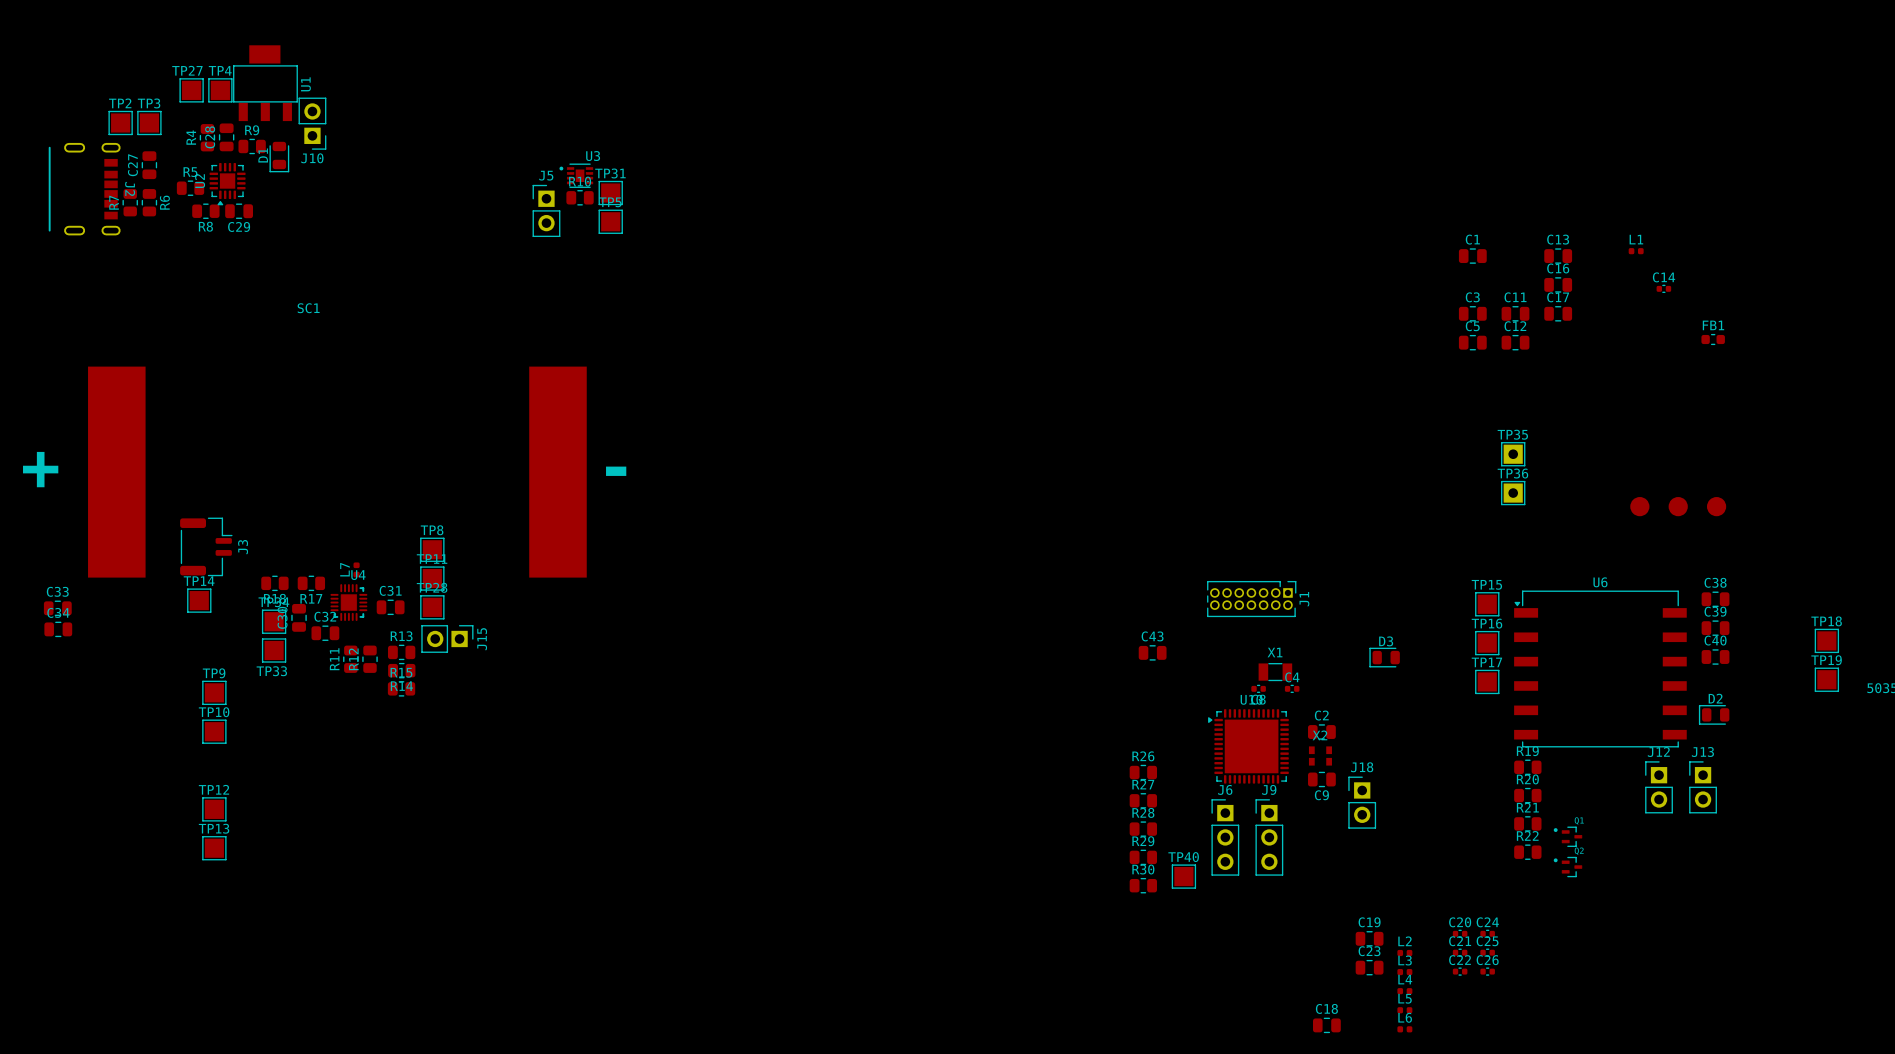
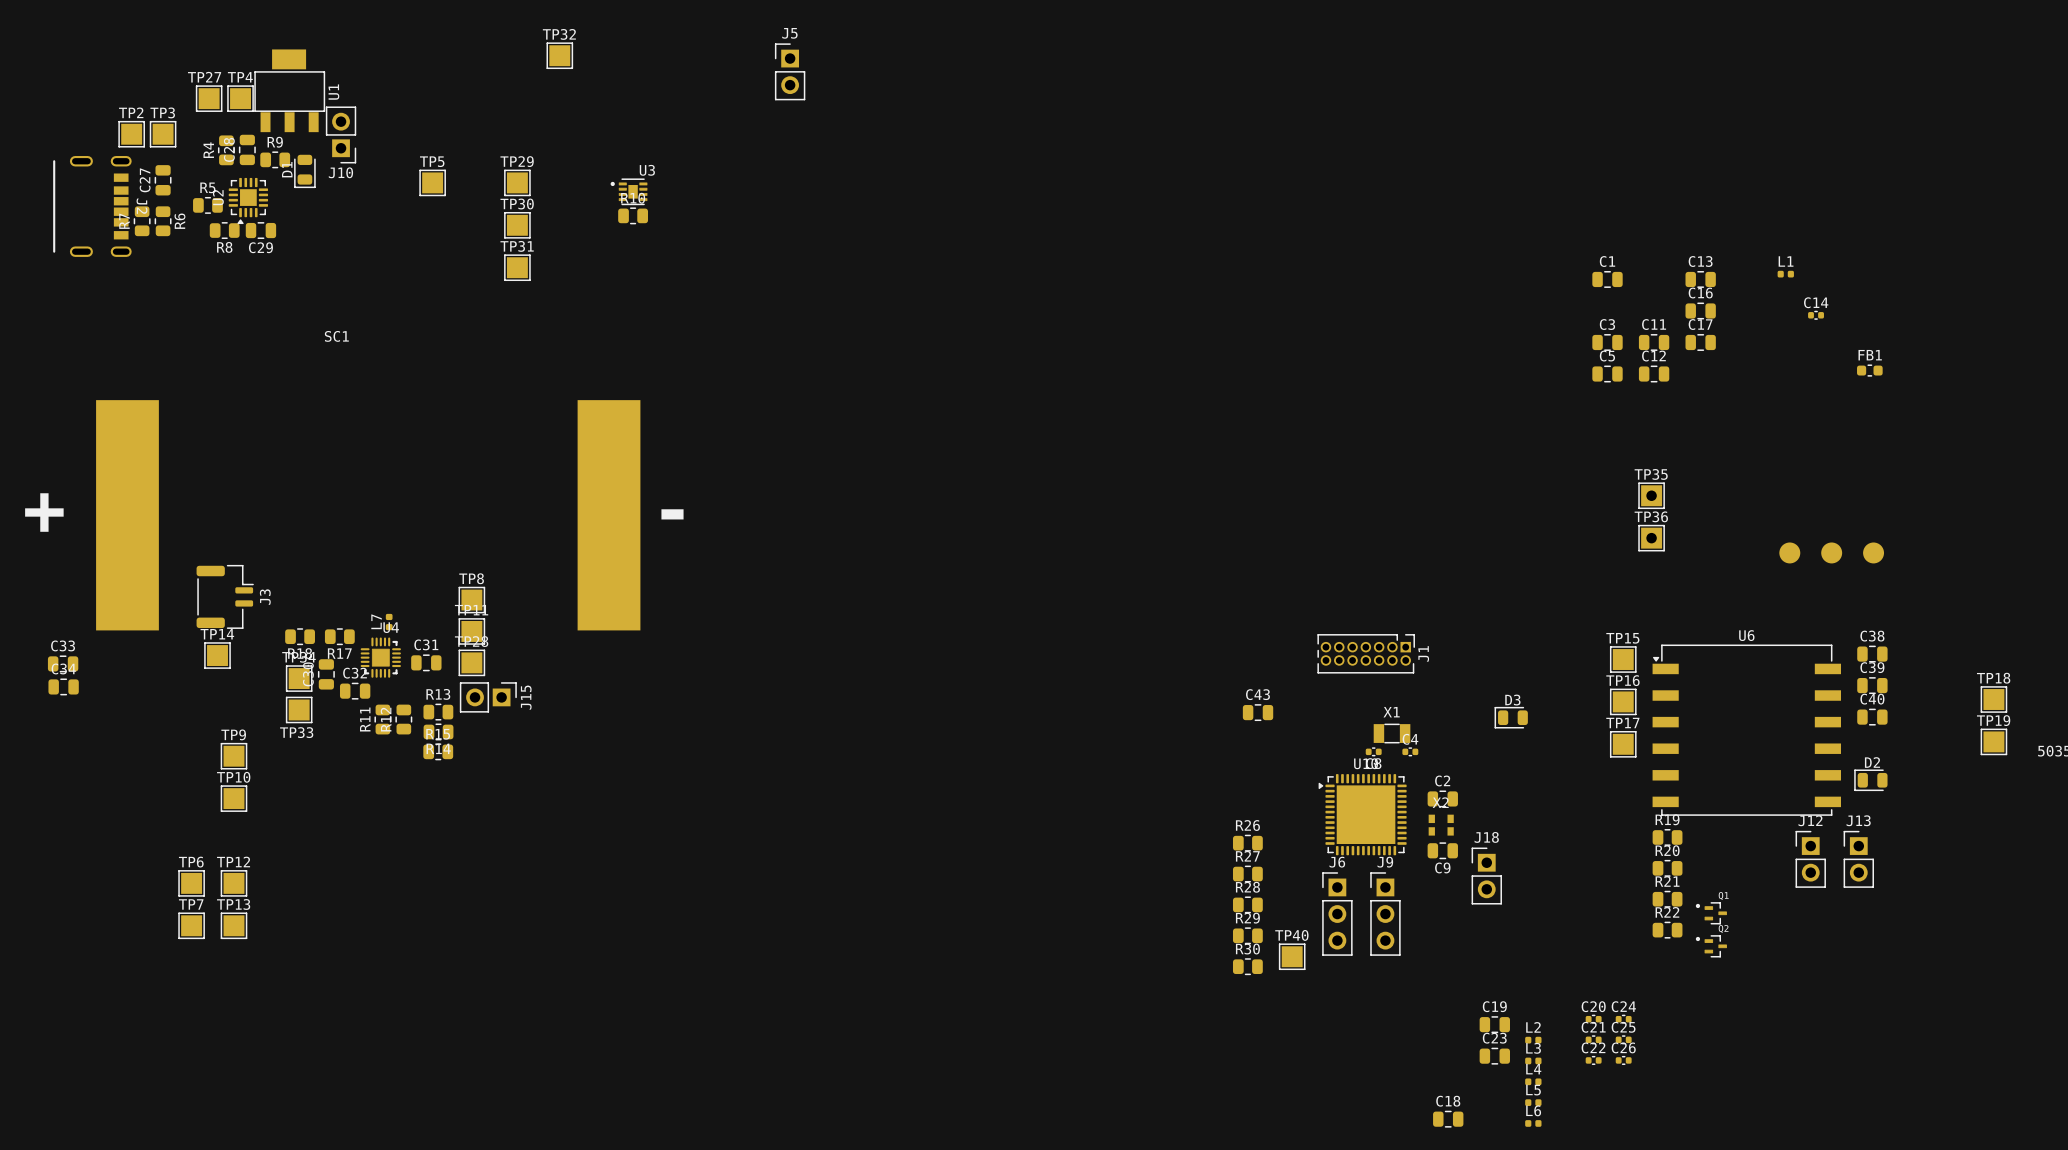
TP32: none -> (559, 55)
TP29: none -> (517, 182)
TP31 position: (610, 193) -> (517, 267)
TP30: none -> (517, 225)
J5 position: (546, 210) -> (790, 71)
TP5 position: (610, 221) -> (432, 182)
TP6: none -> (191, 883)
TP7: none -> (191, 925)

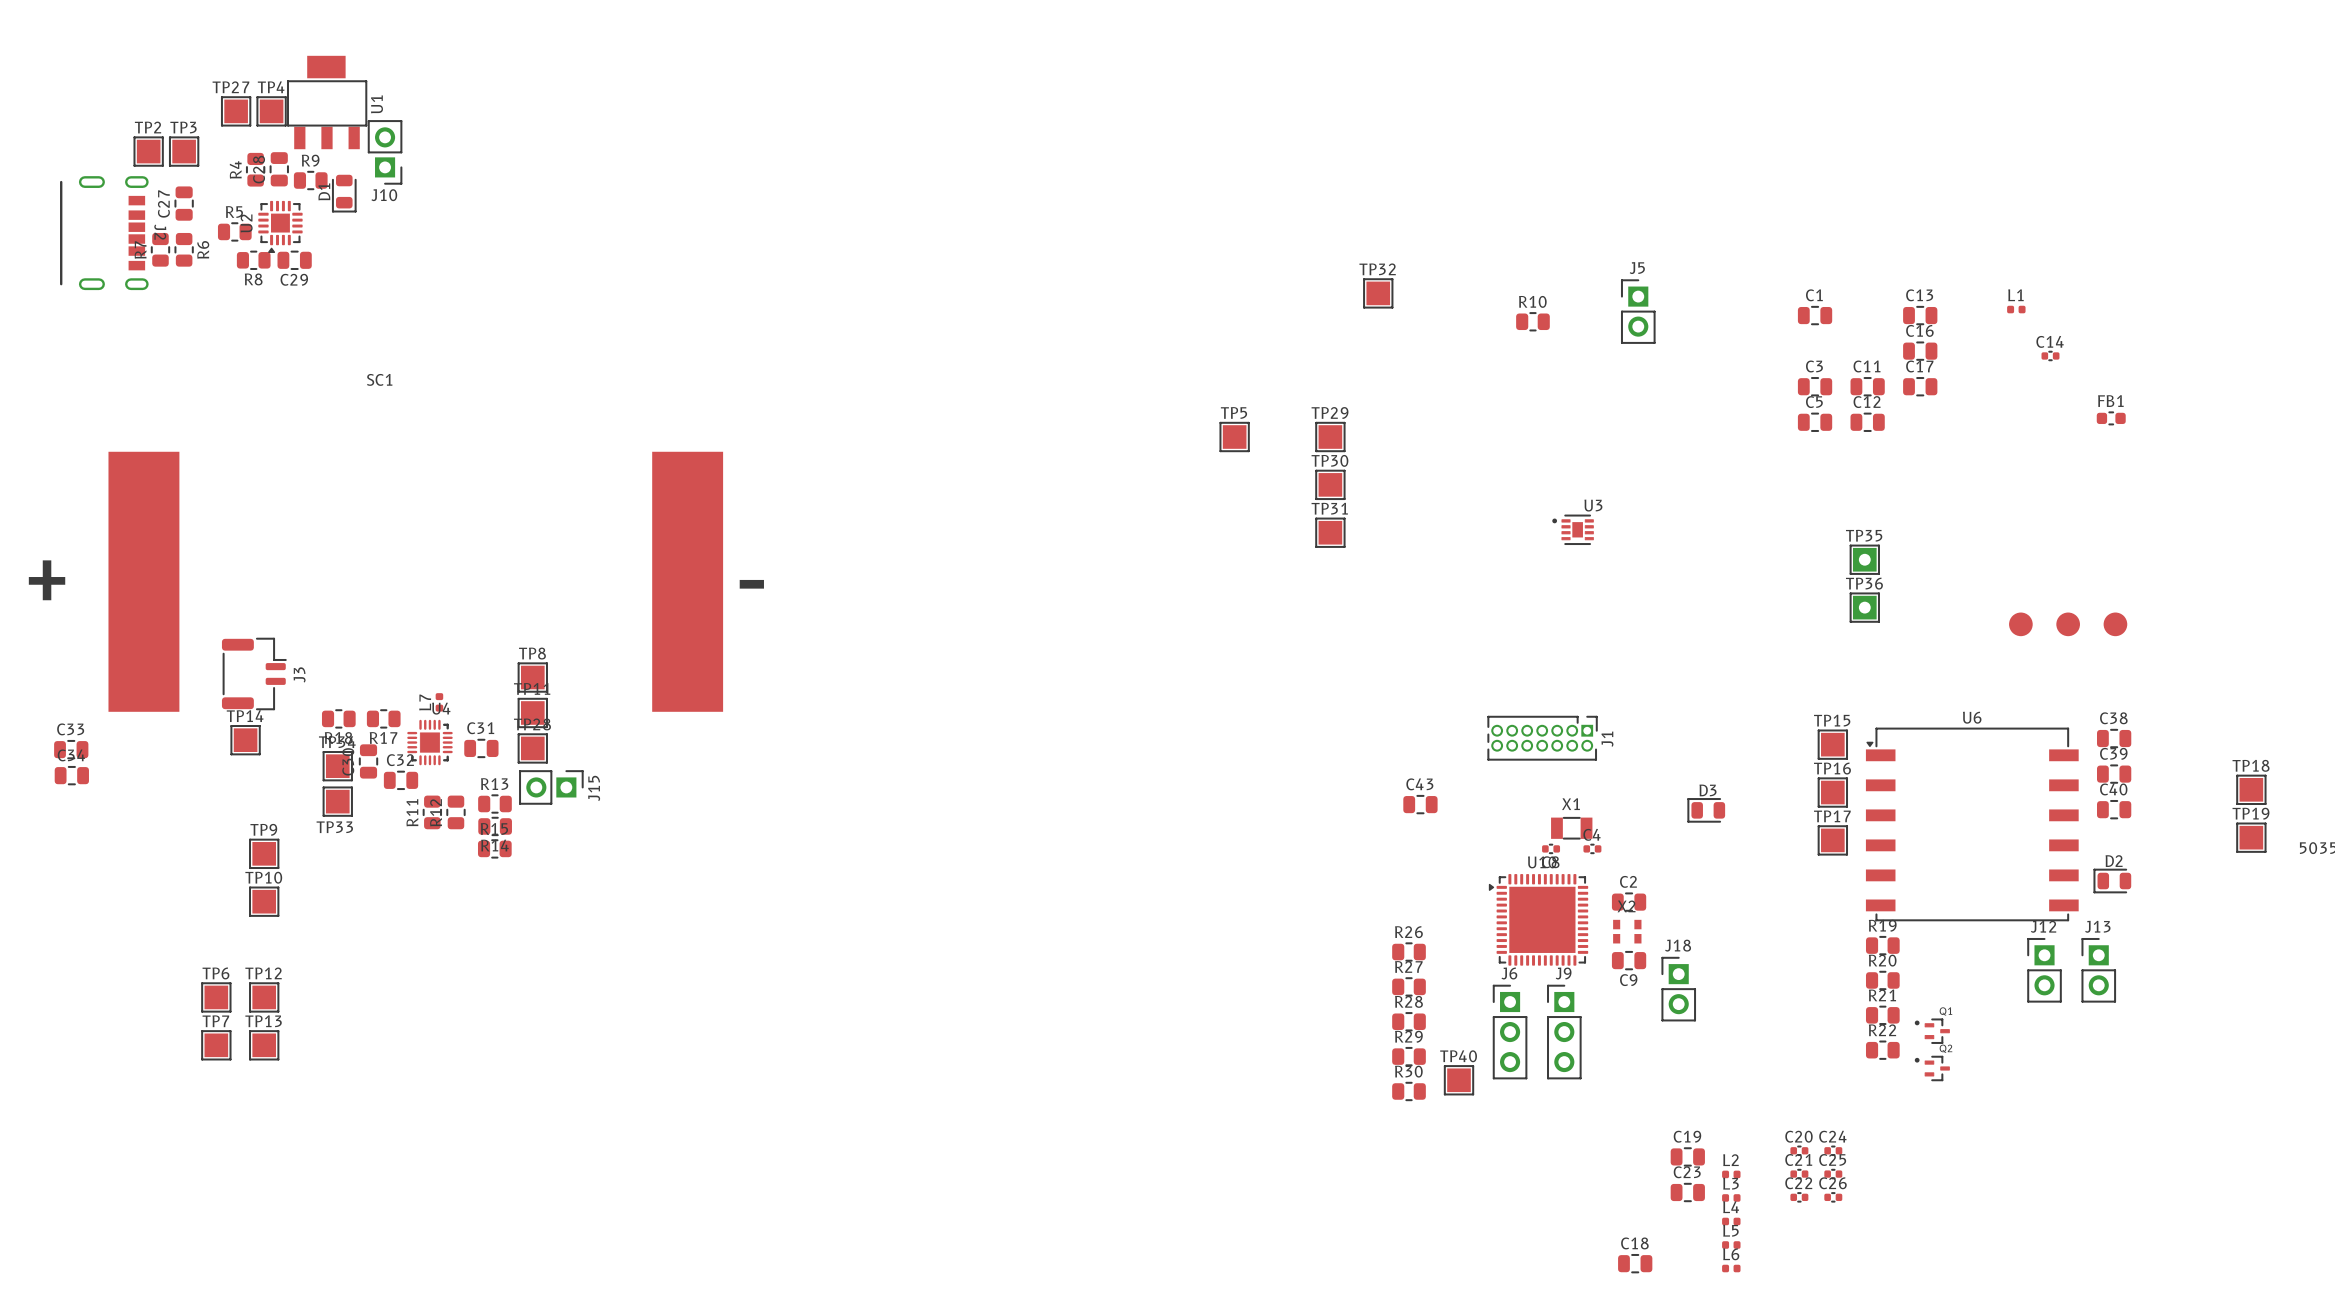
TP32 position: (559, 55) -> (1378, 293)
J5 position: (790, 71) -> (1638, 311)
TP5 position: (432, 182) -> (1234, 437)
TP29 position: (517, 182) -> (1330, 437)
U3 position: (629, 191) -> (1573, 529)
R10 position: (633, 215) -> (1532, 321)
TP30 position: (517, 225) -> (1330, 484)
TP31 position: (517, 267) -> (1330, 532)

